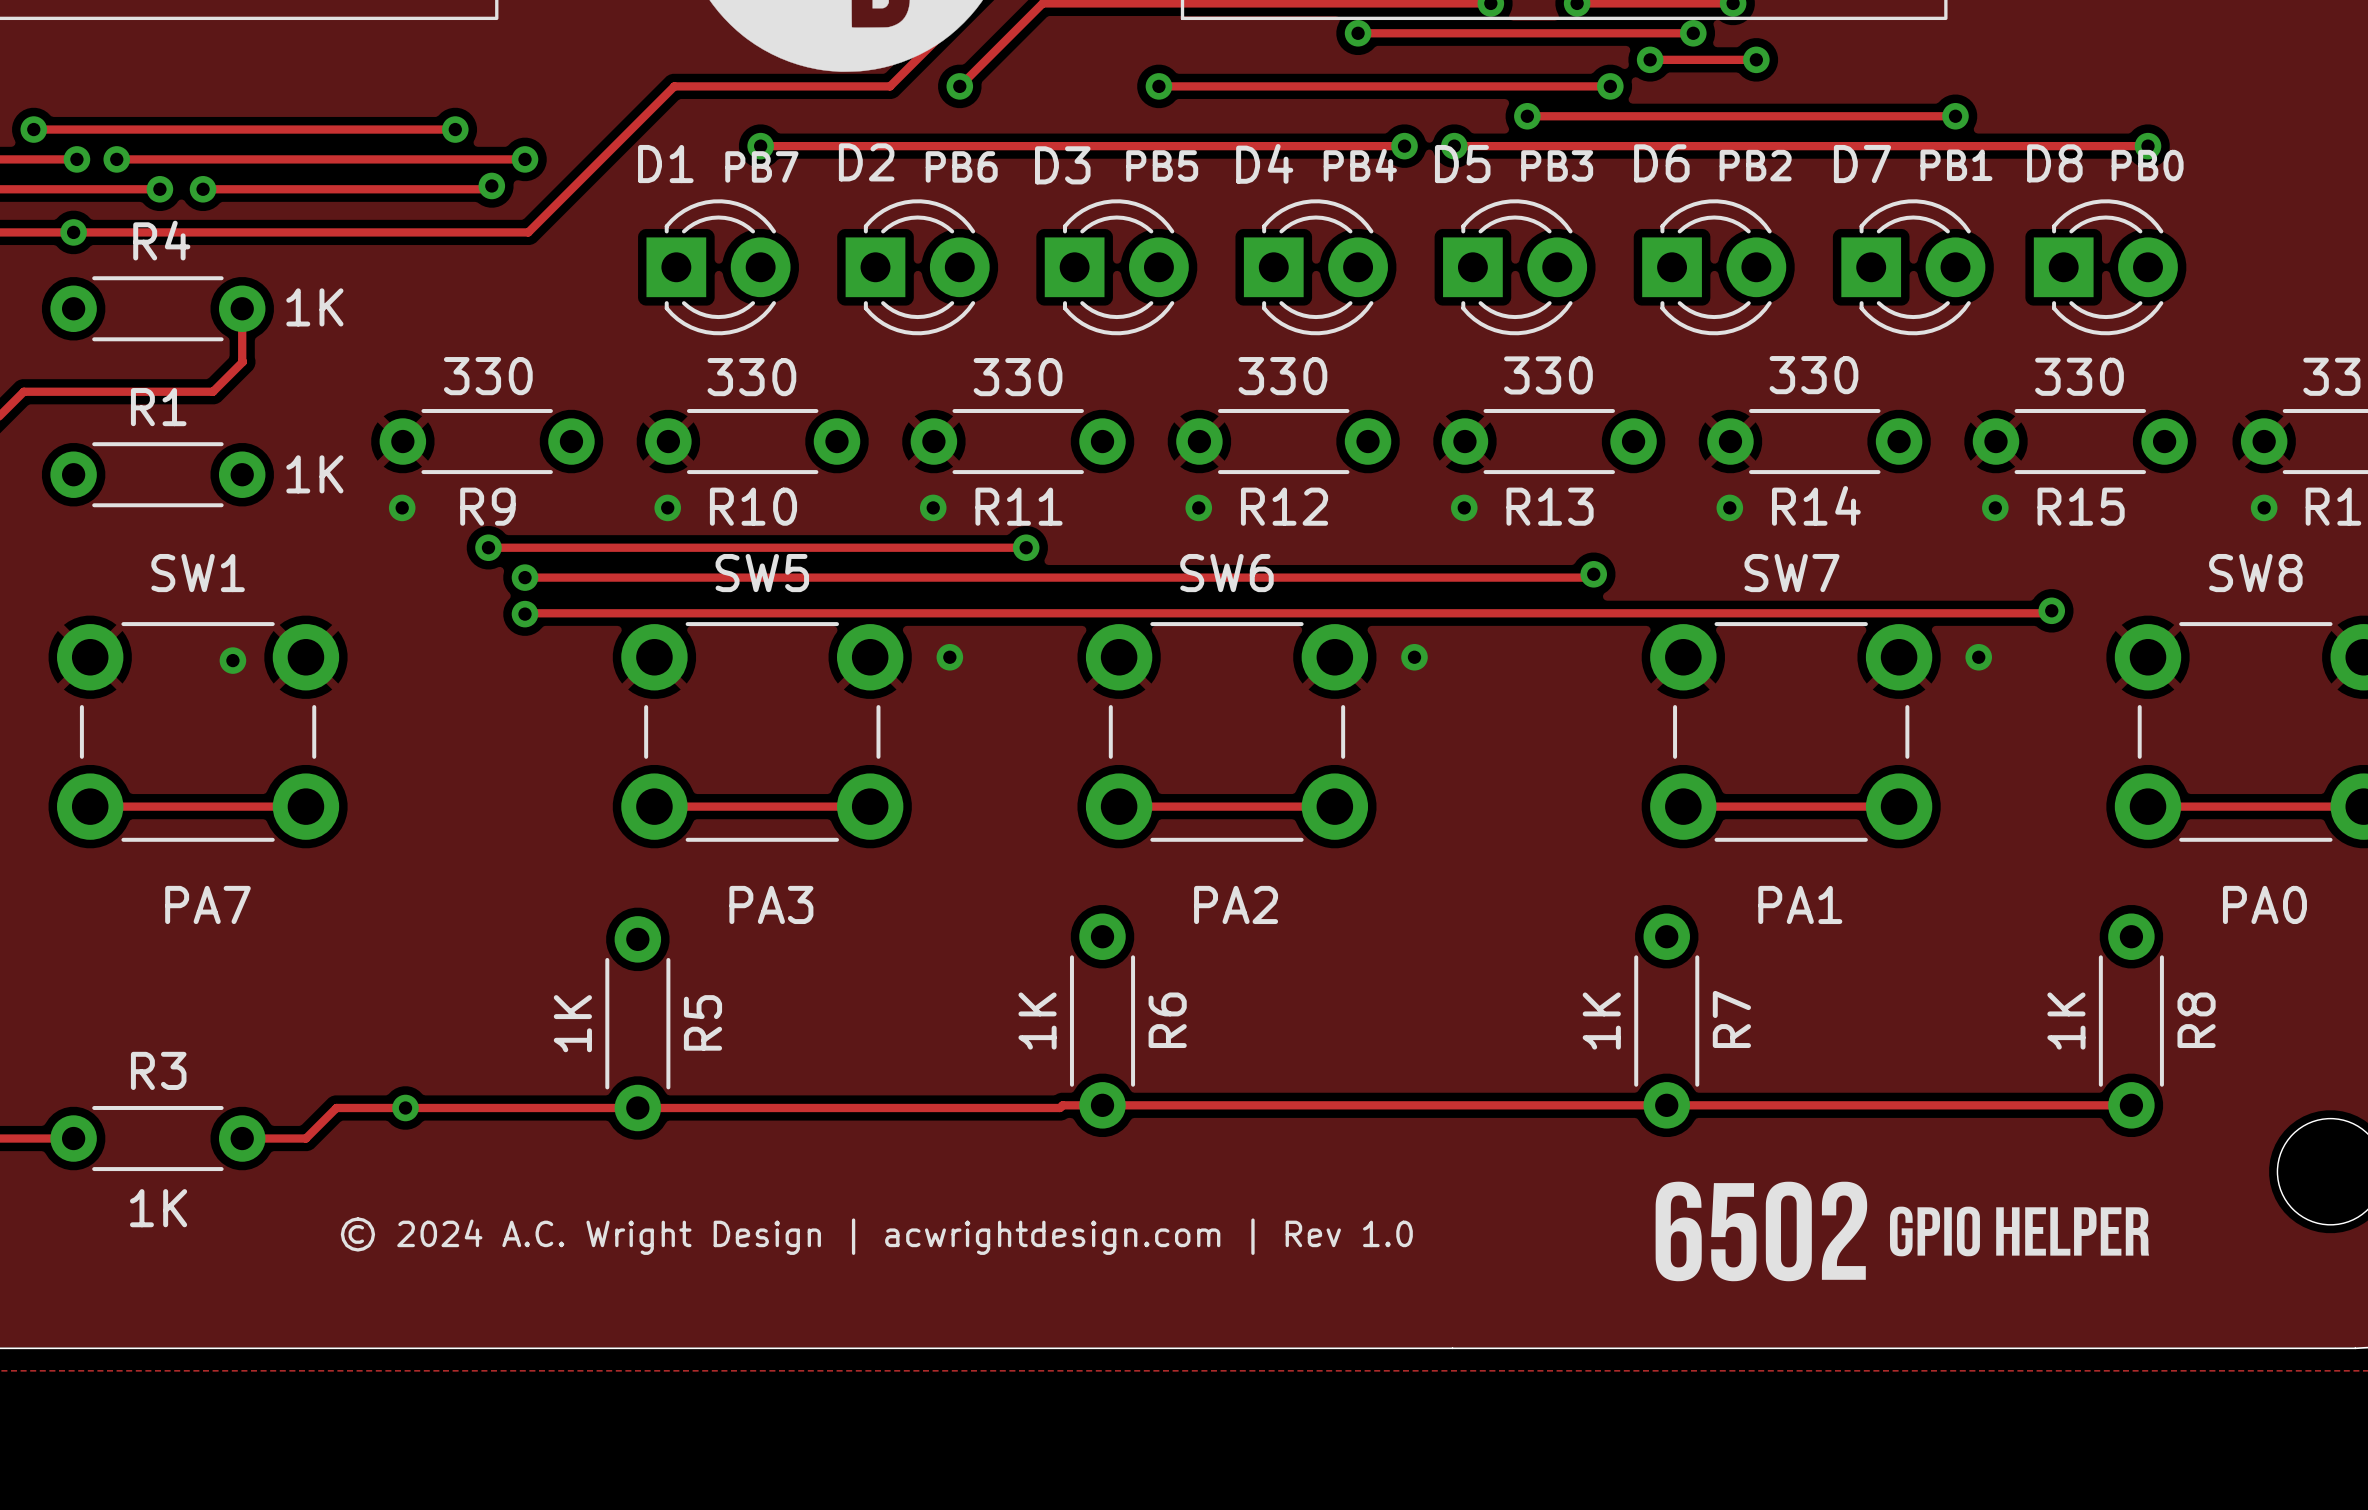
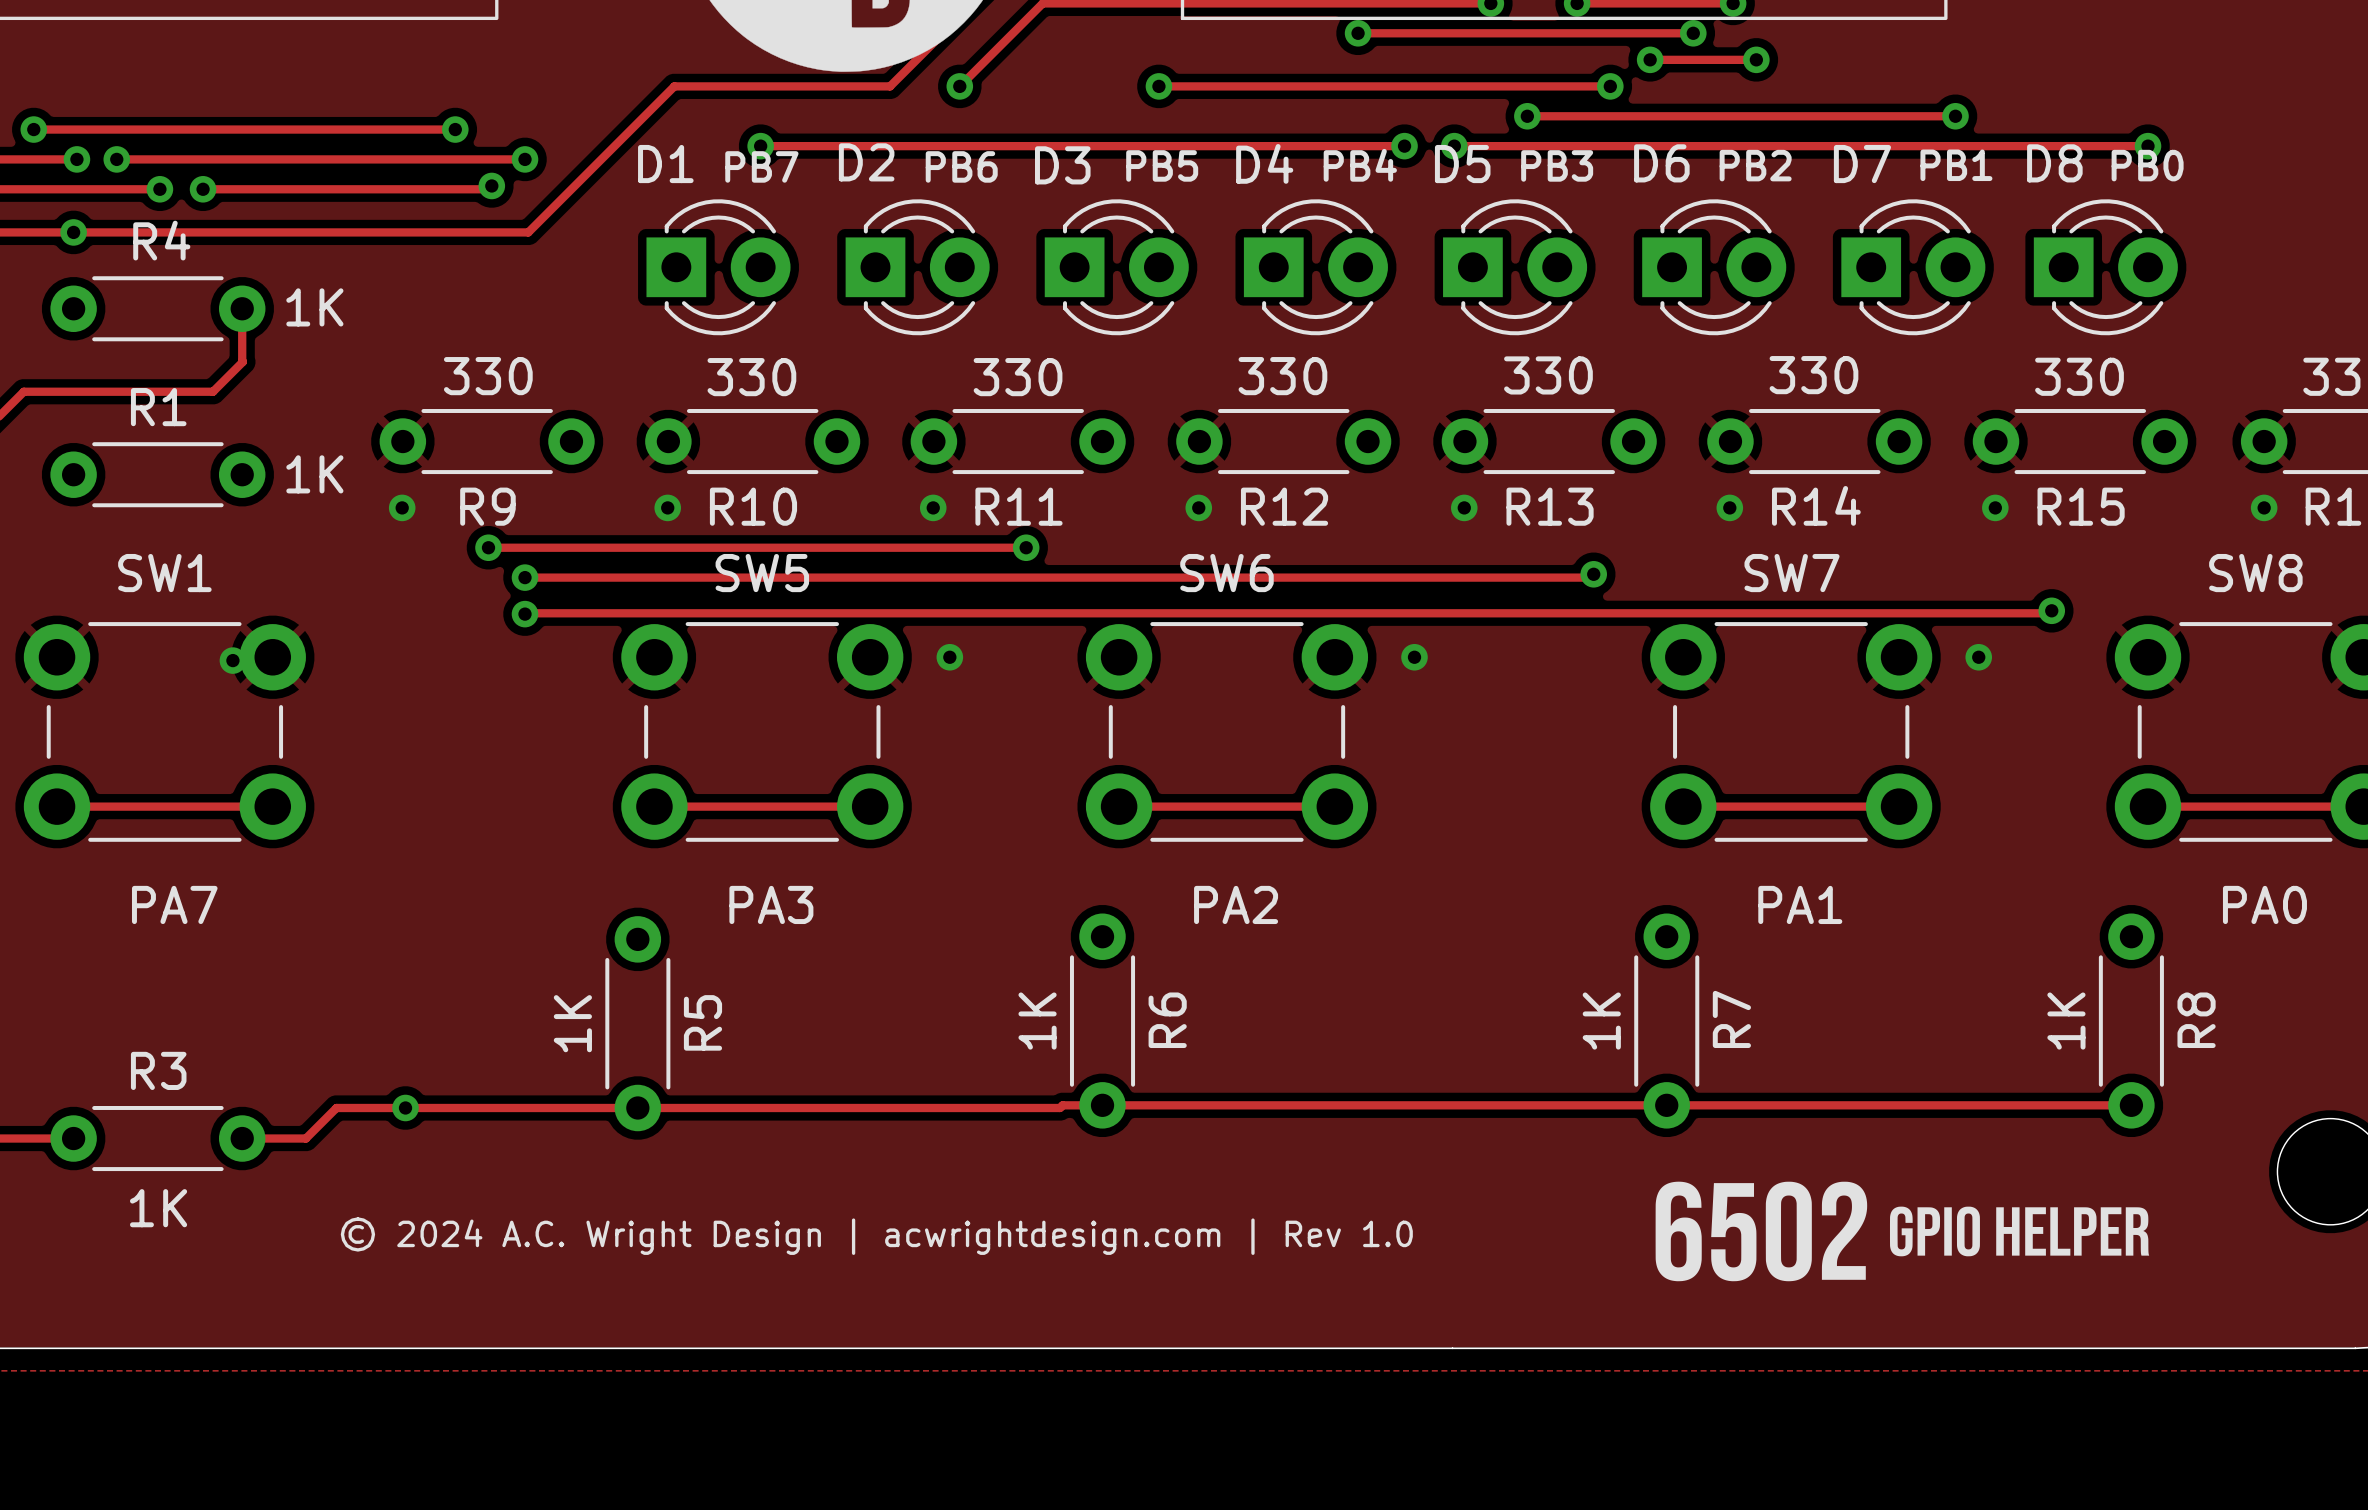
SW1 position: (198, 731) -> (164, 731)

